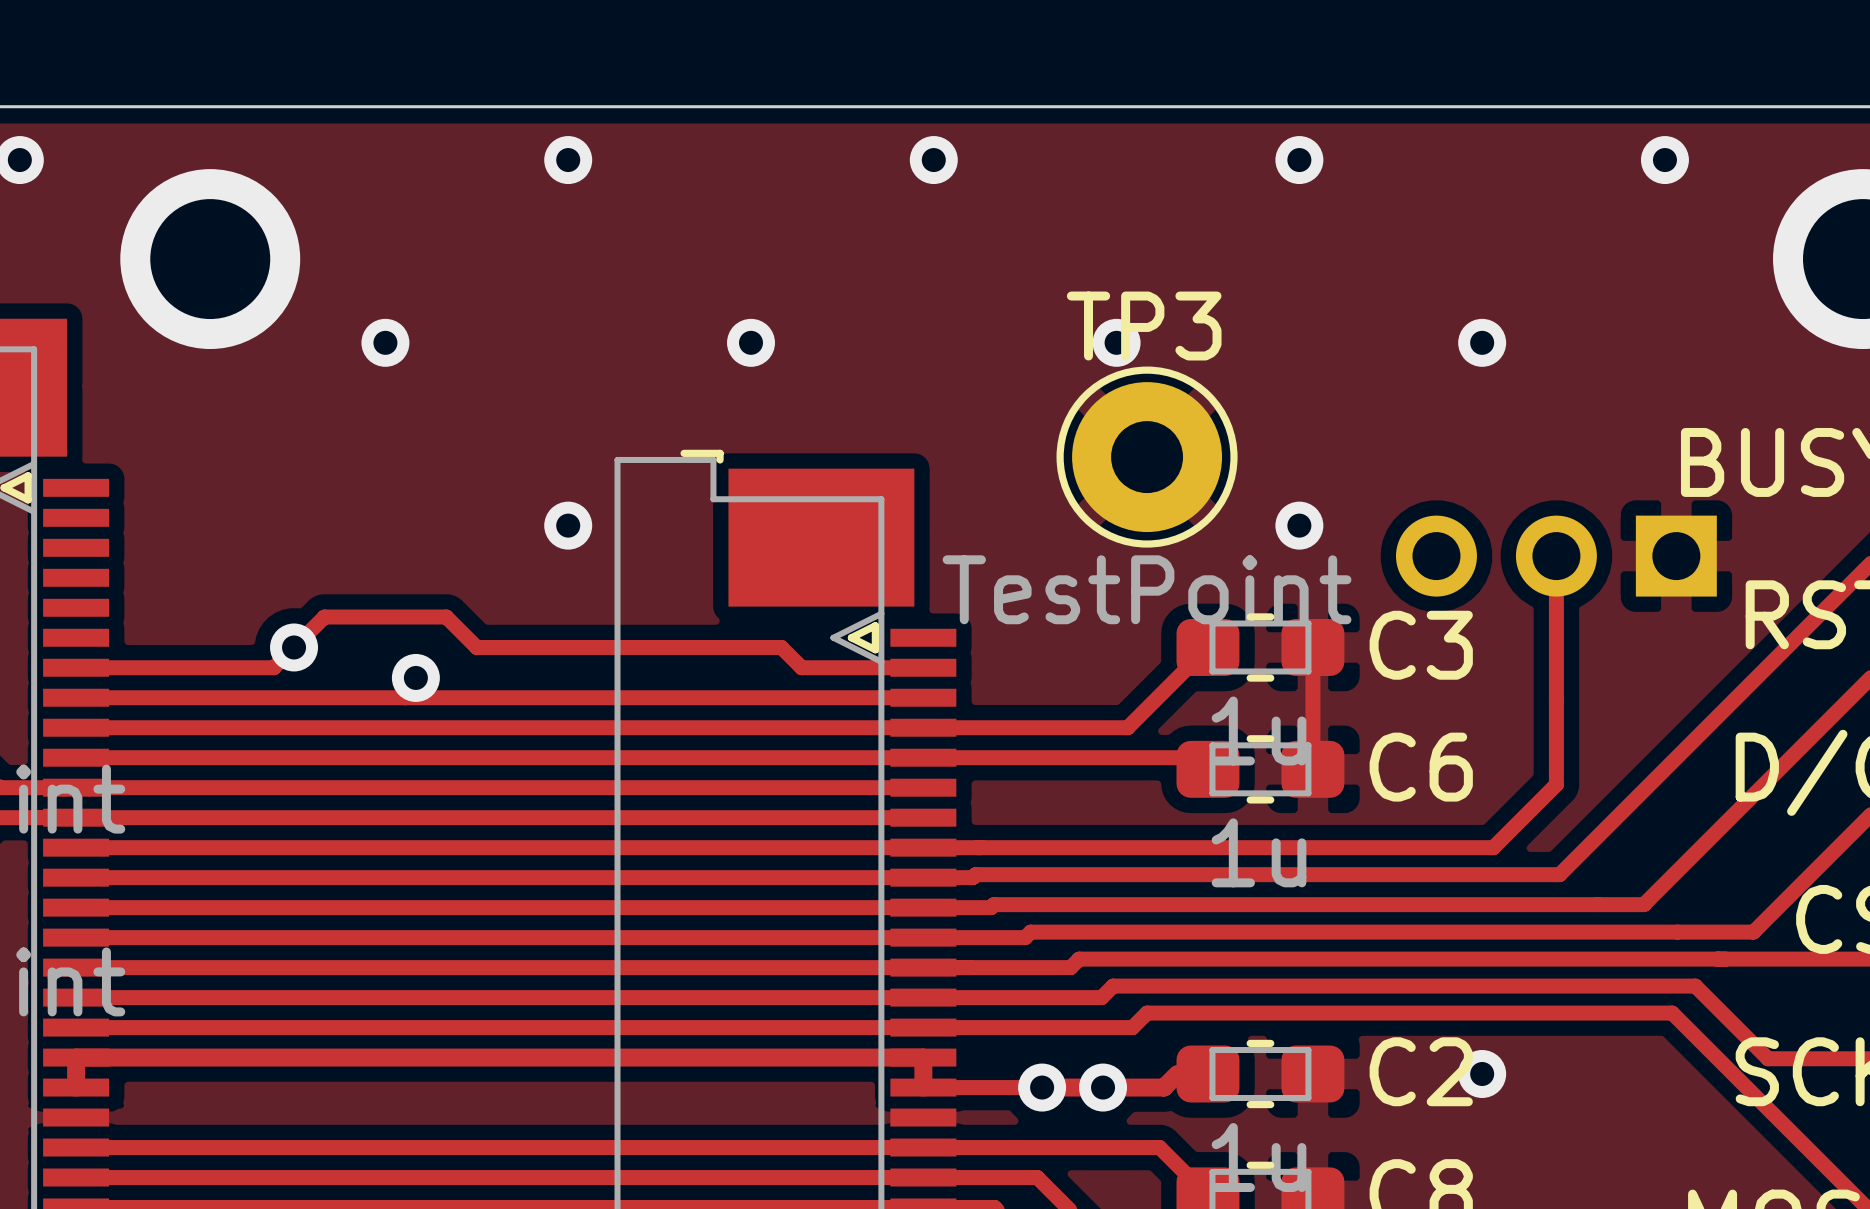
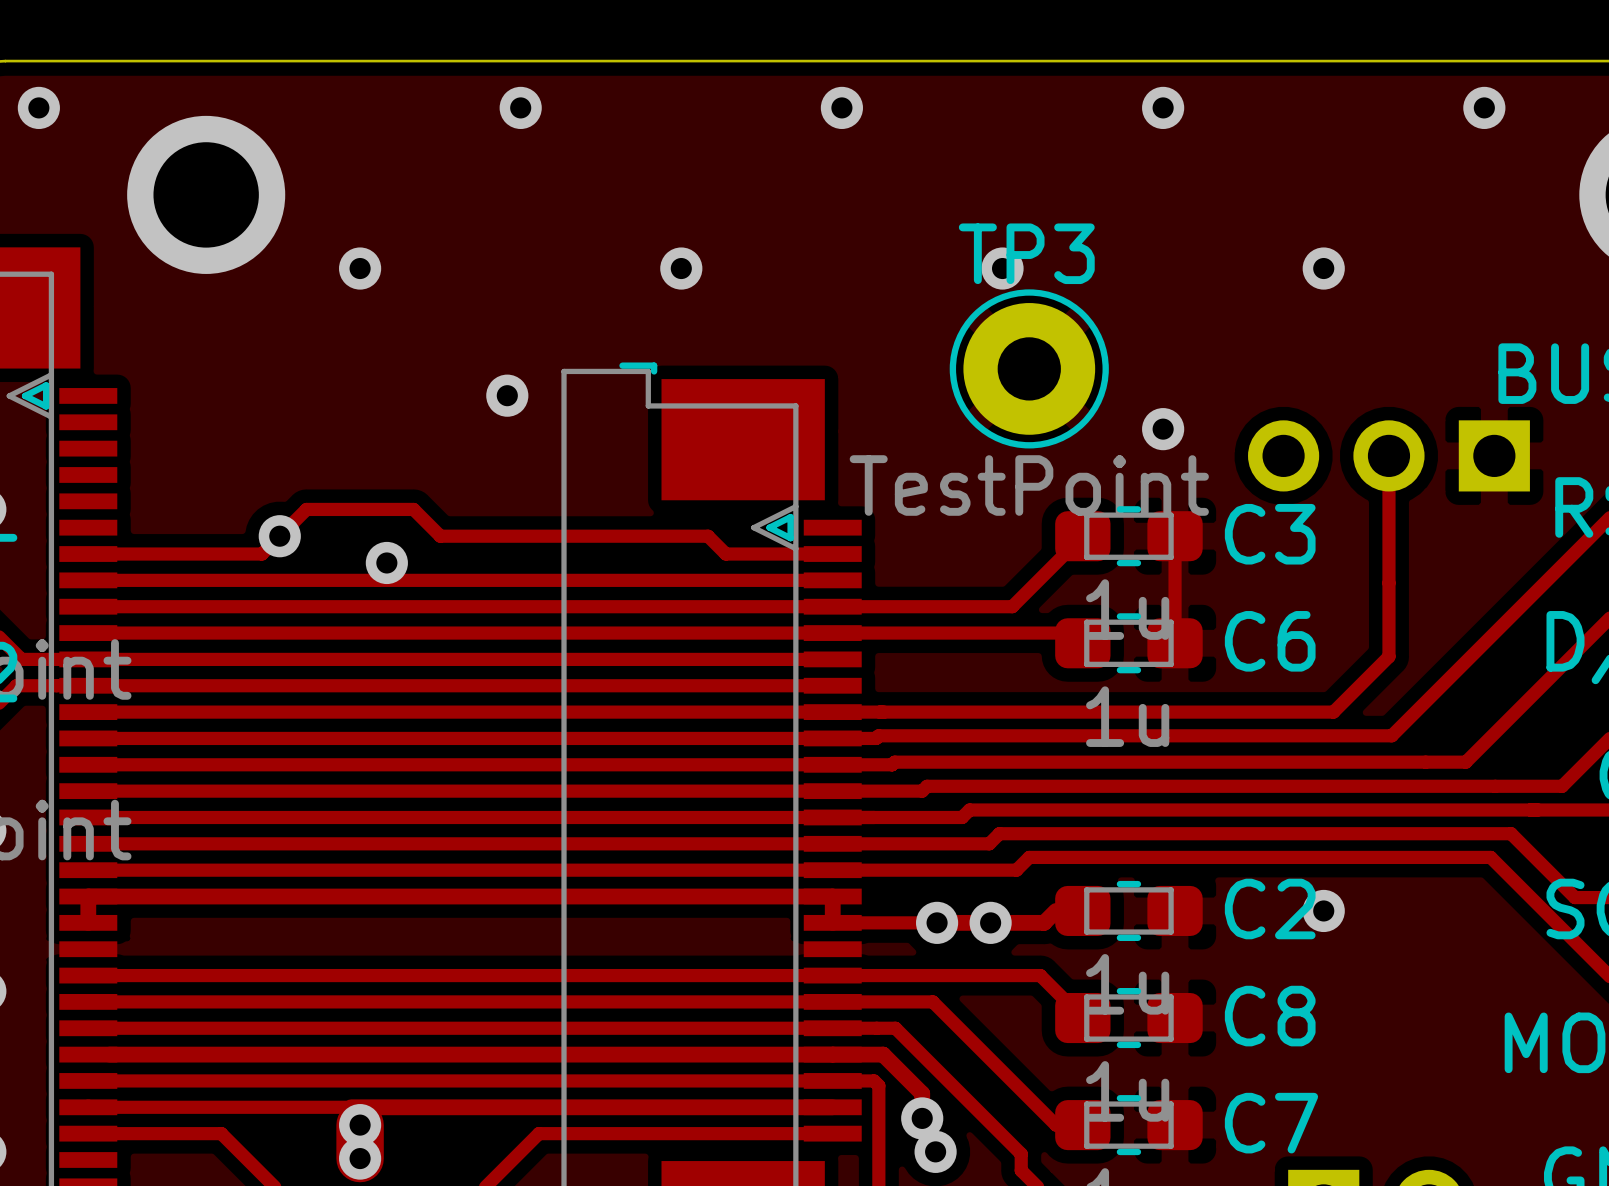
via position: (568, 525) -> (507, 395)

